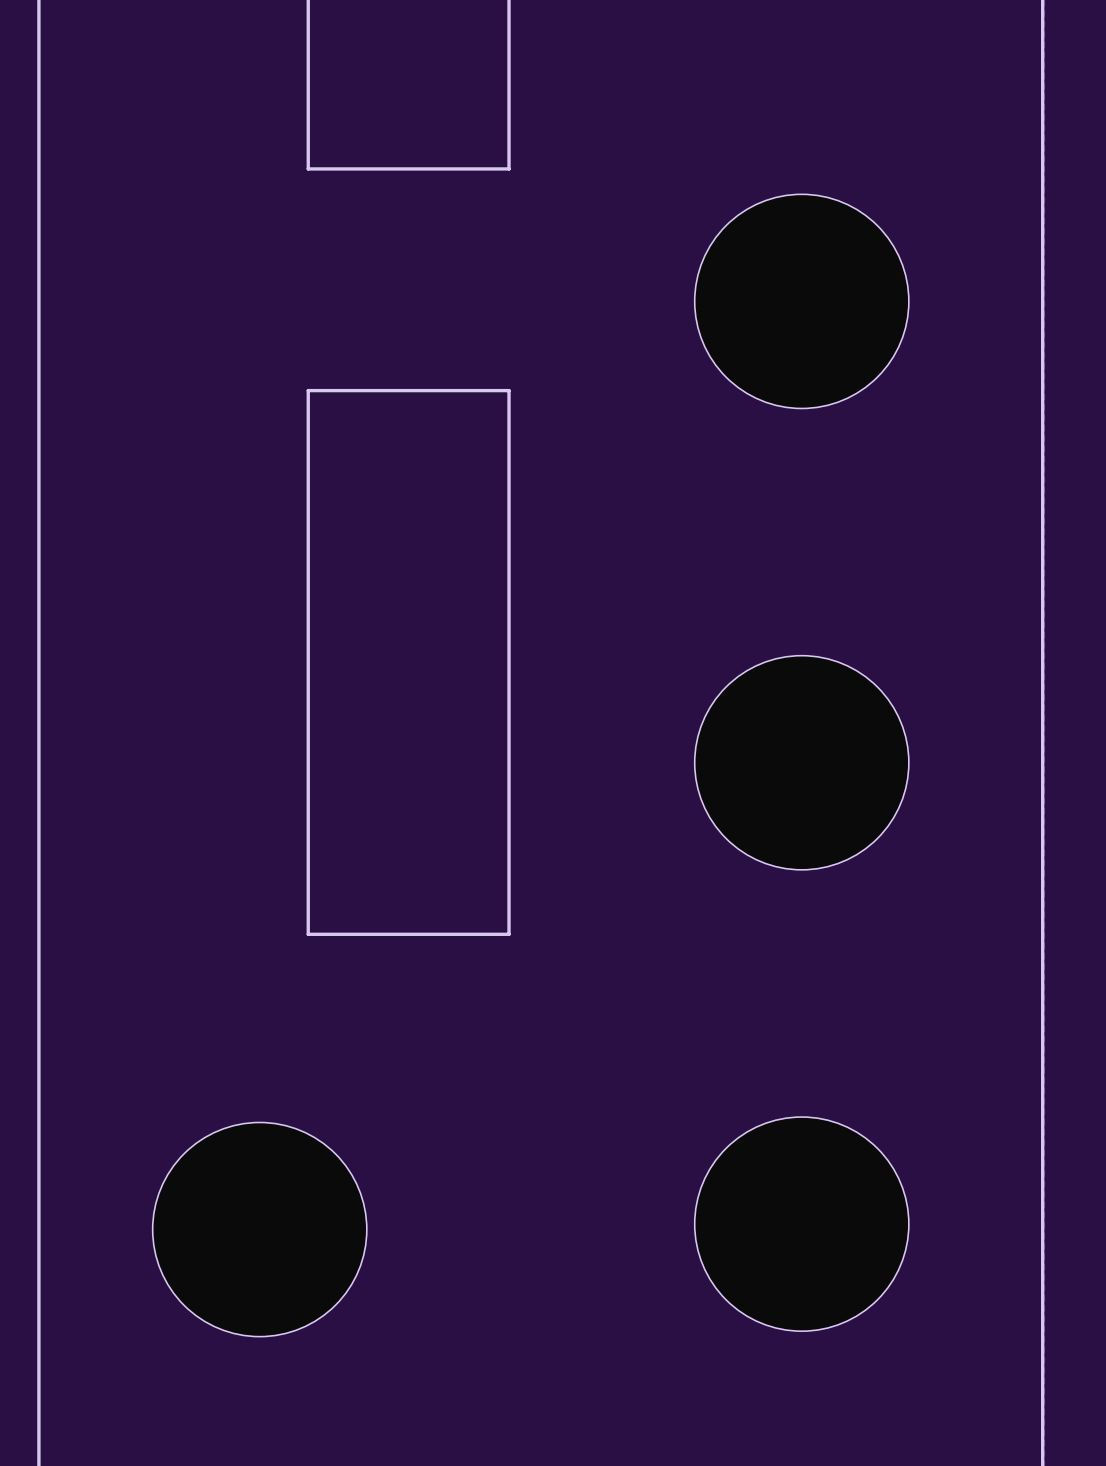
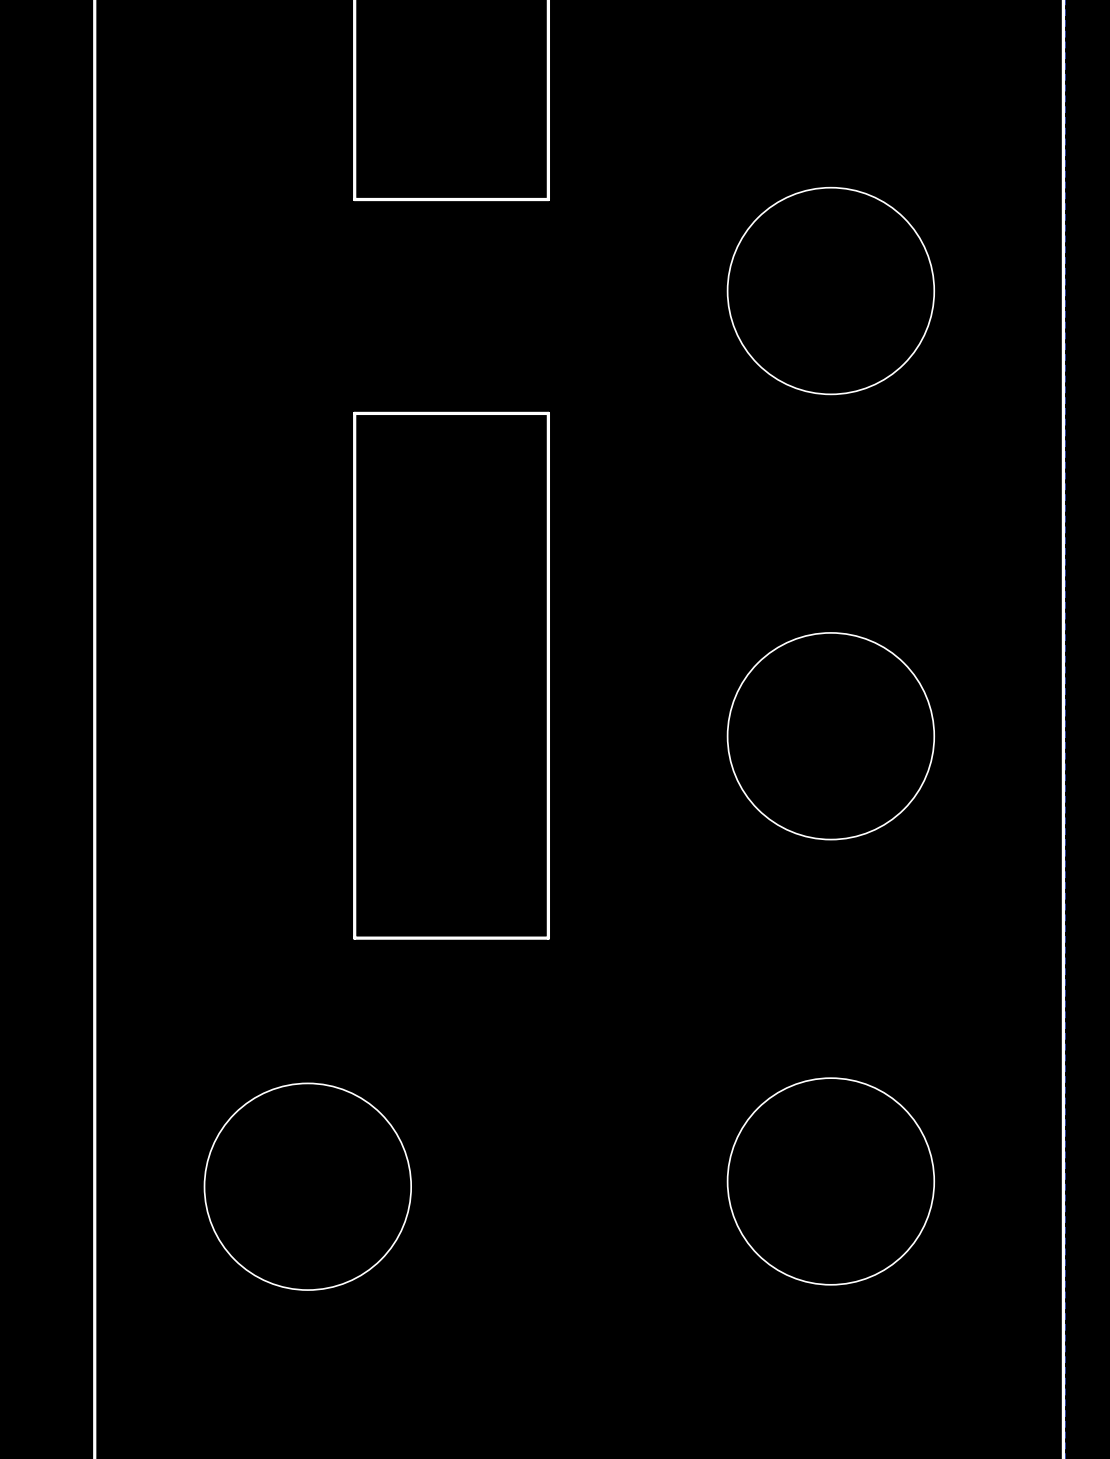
board edge: (509, 168) (308, 168) -> (548, 163) (548, 199) (354, 199) (354, 163)
board edge: (509, 428) (509, 390) (308, 390) (308, 428) -> (548, 413) (354, 413)
board edge: (509, 934) (308, 934) -> (548, 901) (548, 938) (354, 938) (354, 901)

